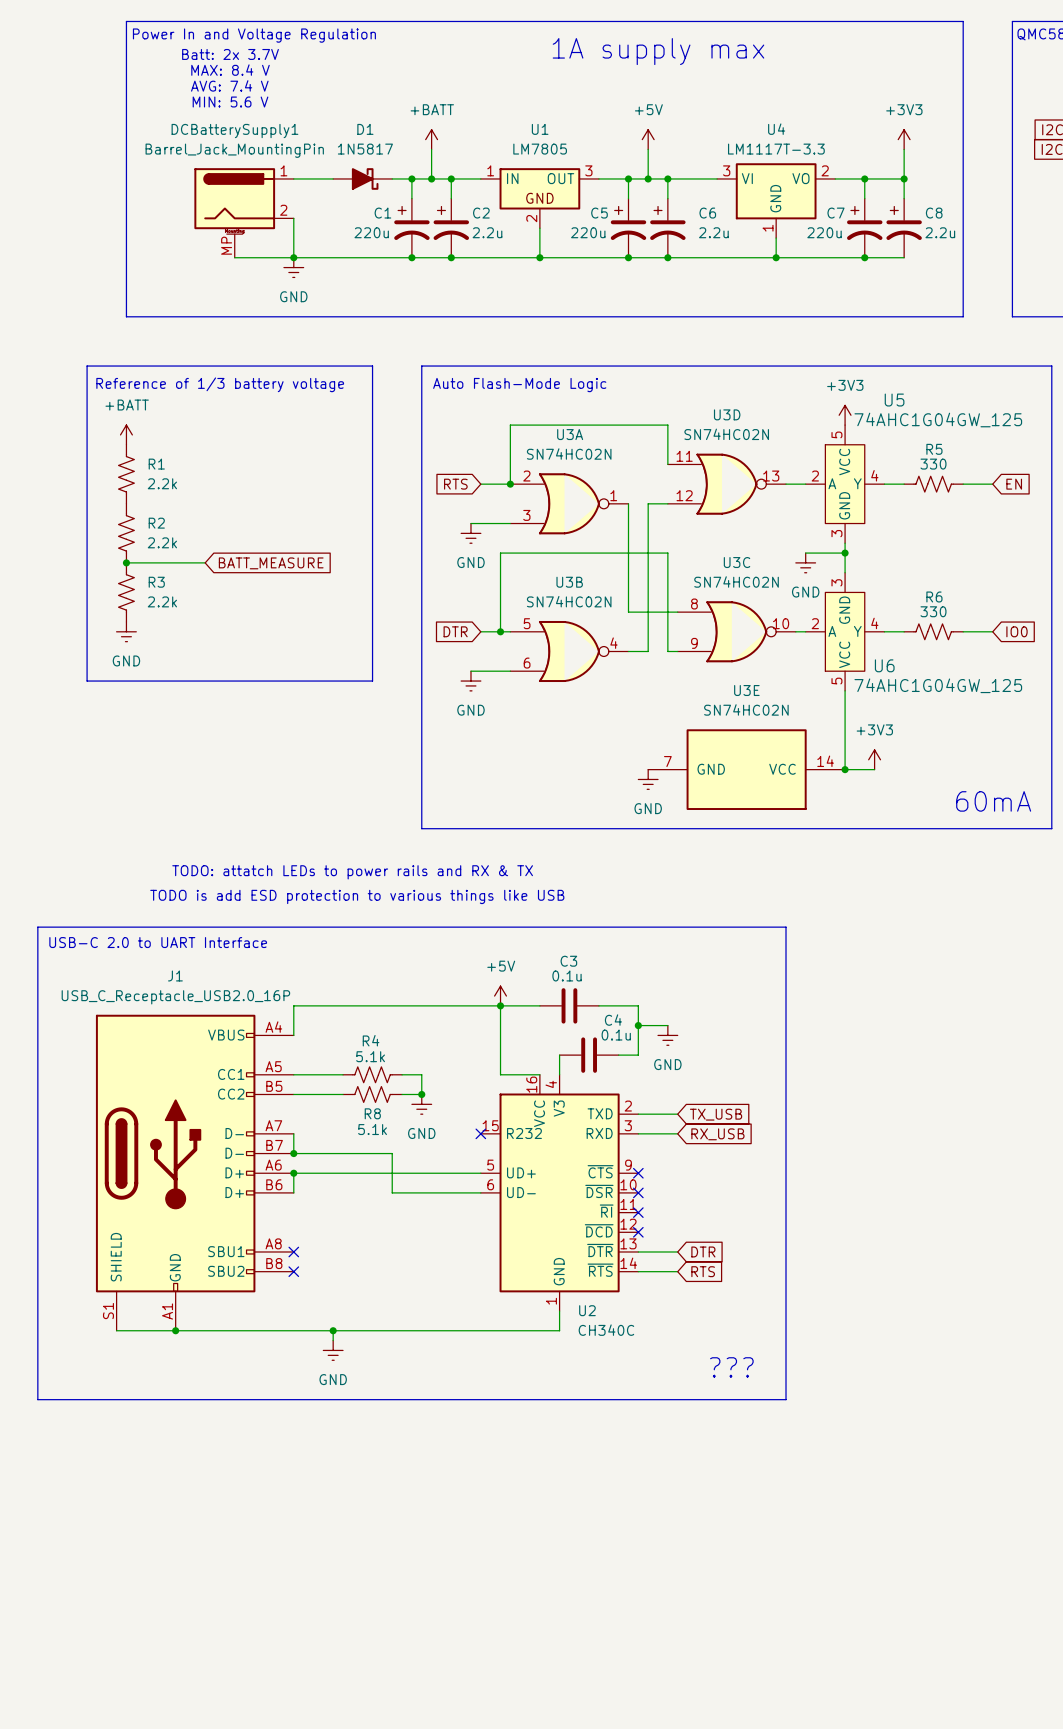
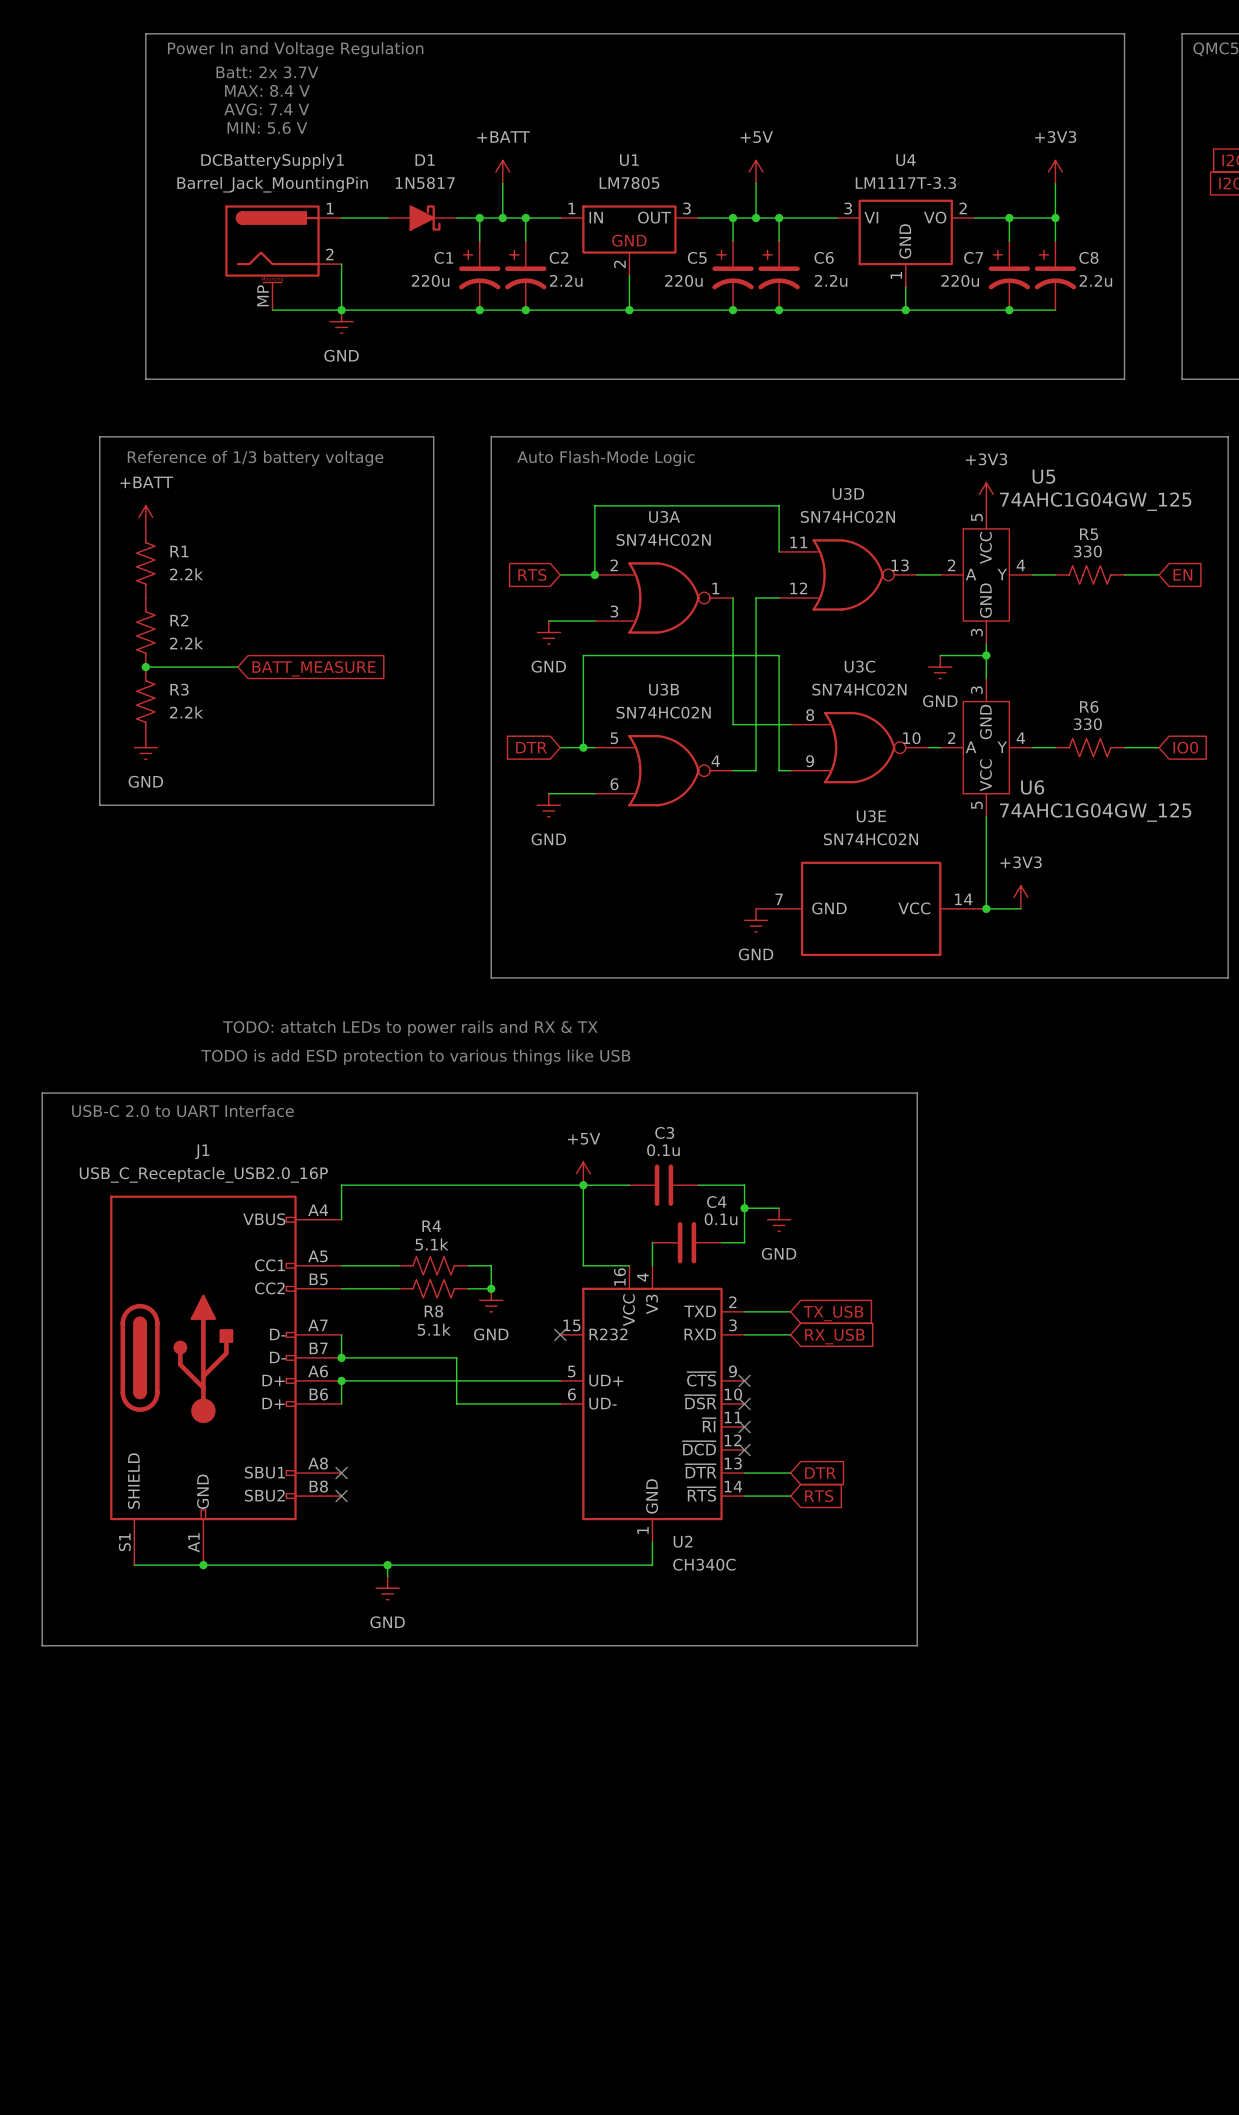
text: 1A supply max (658, 51) -> none
text: 60mA (993, 801) -> none
text: ??? (731, 1367) -> none

